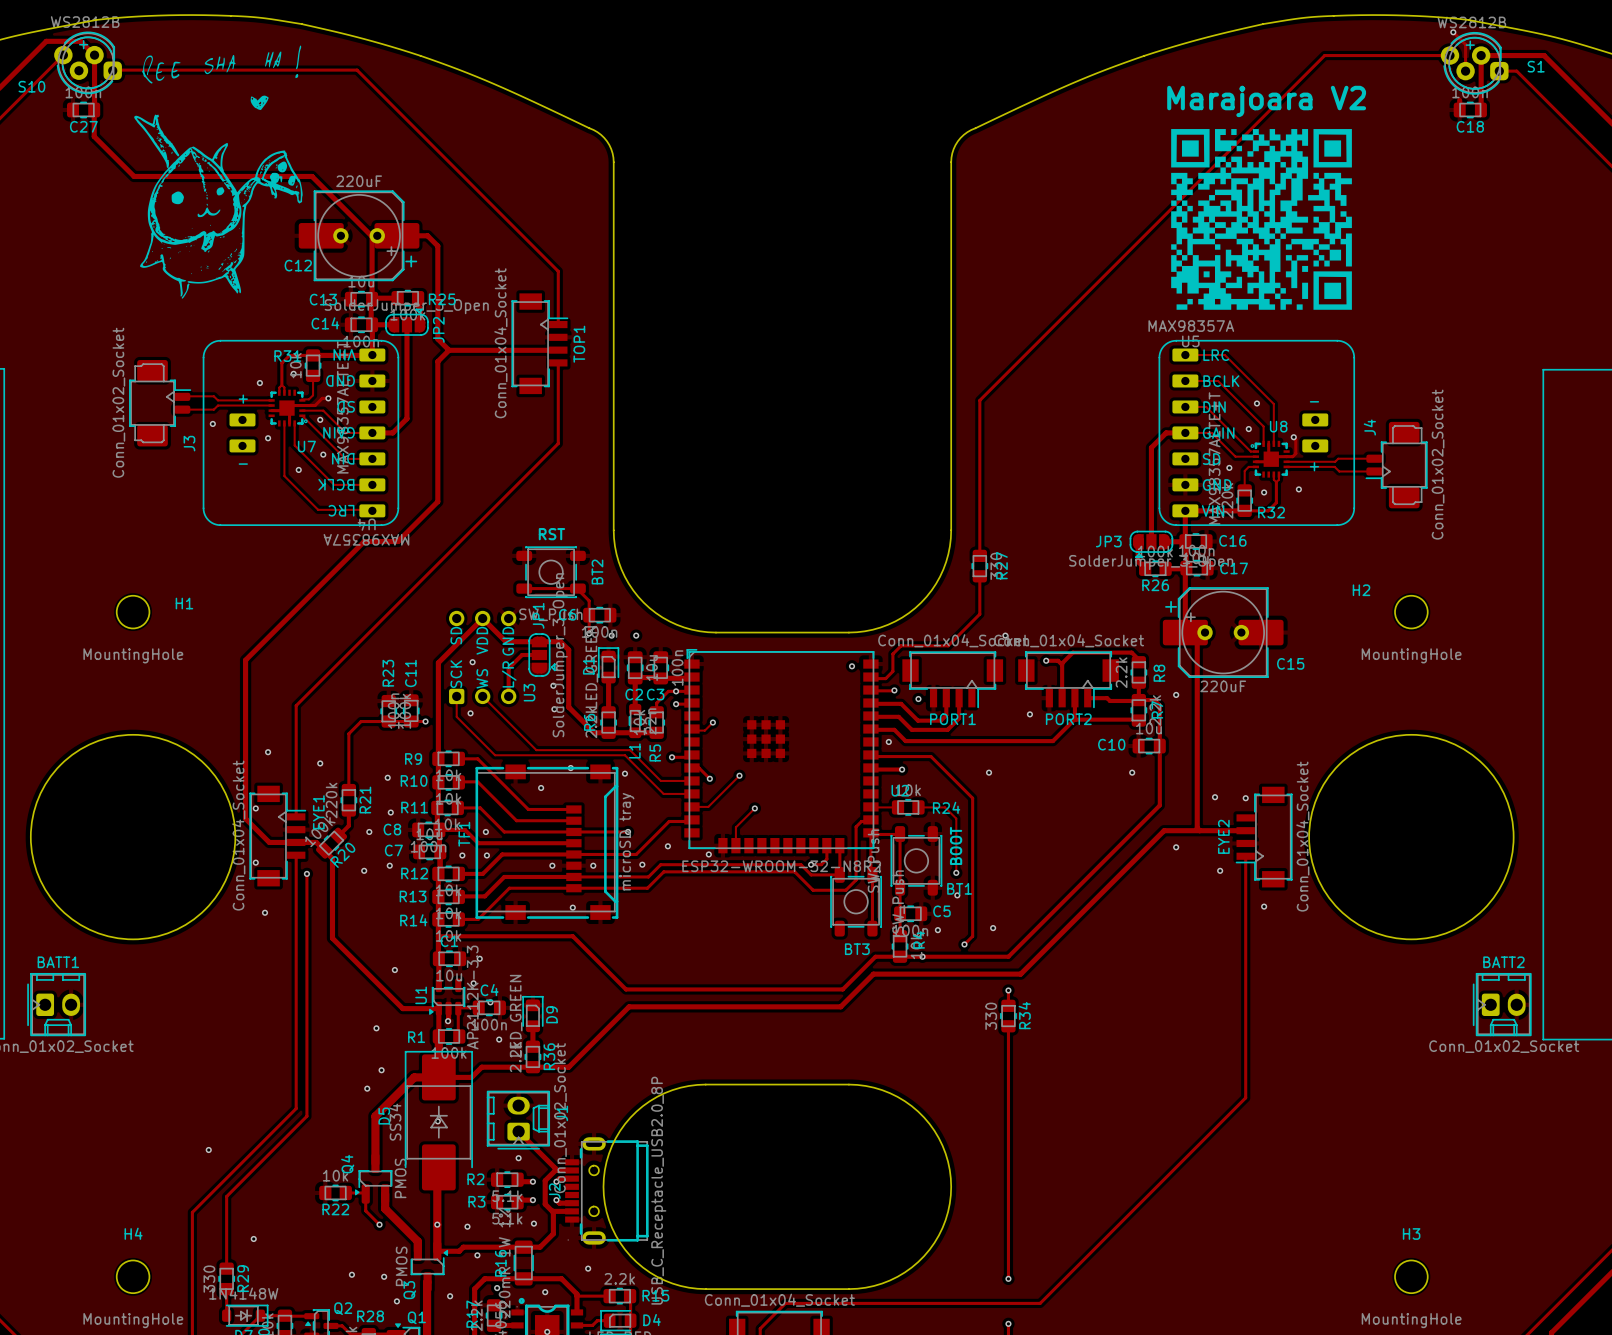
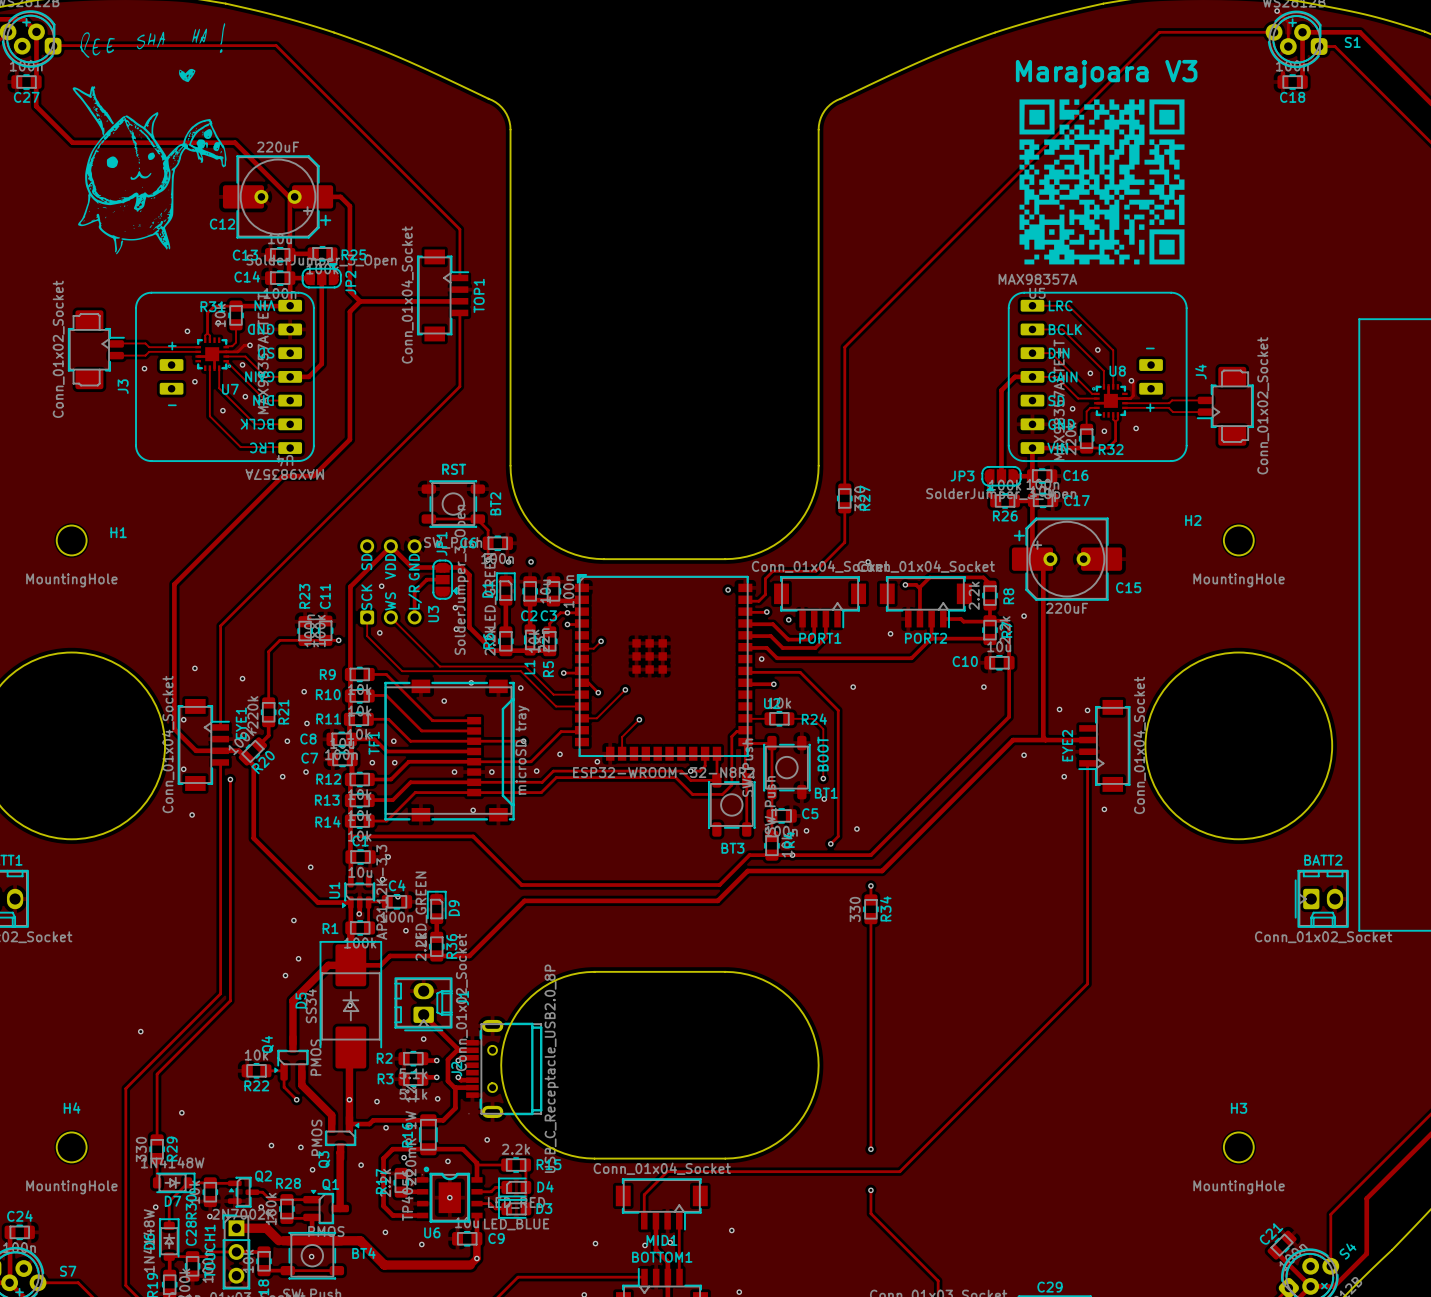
text: Marajoara V2 (1266, 101) -> Marajoara V3 (1106, 74)

